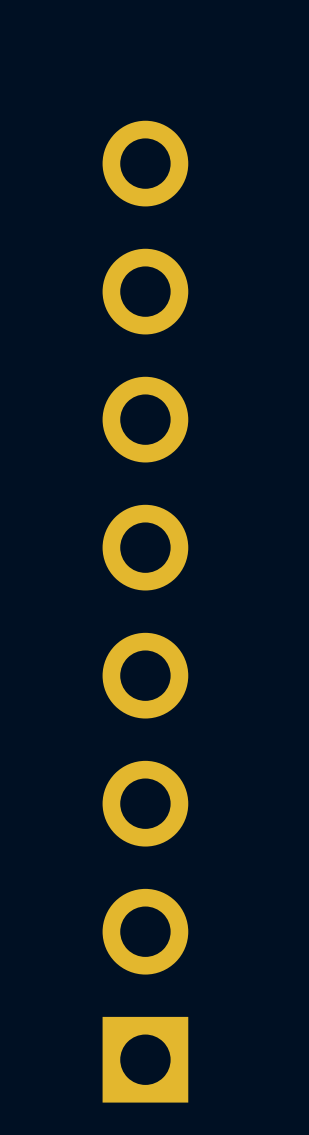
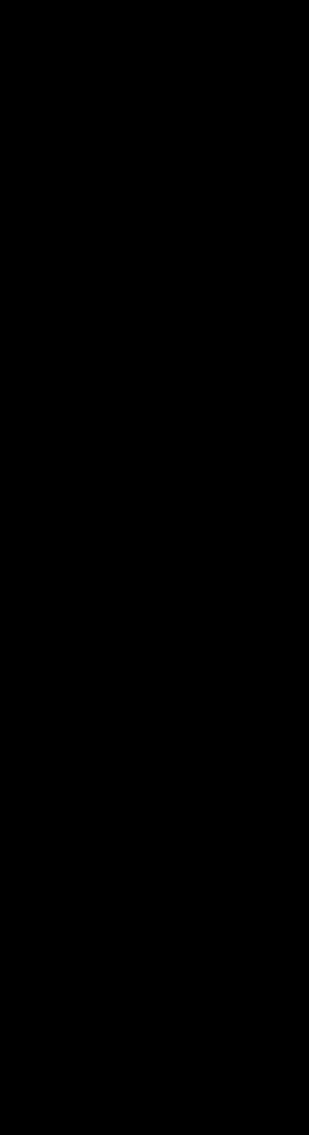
part: (145, 611) -> none

